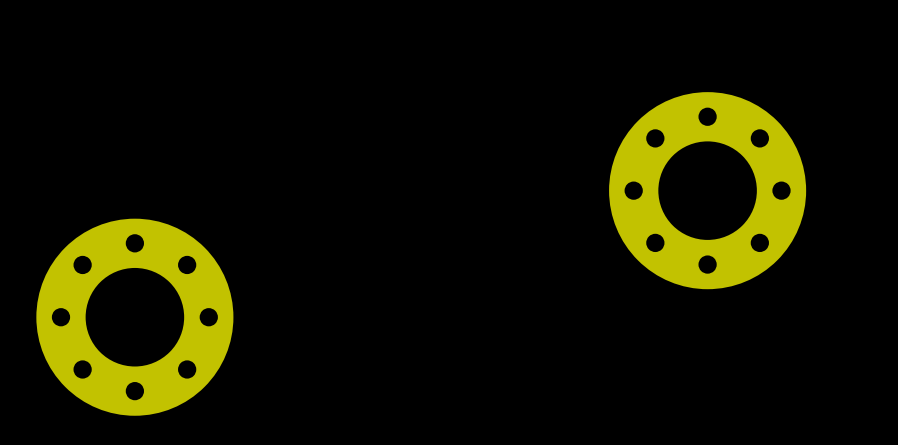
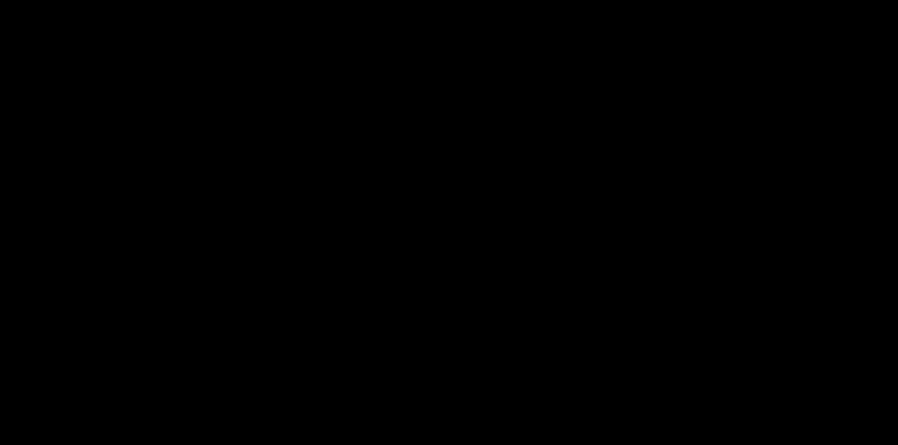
part: (707, 190) -> none
part: (134, 317) -> none

